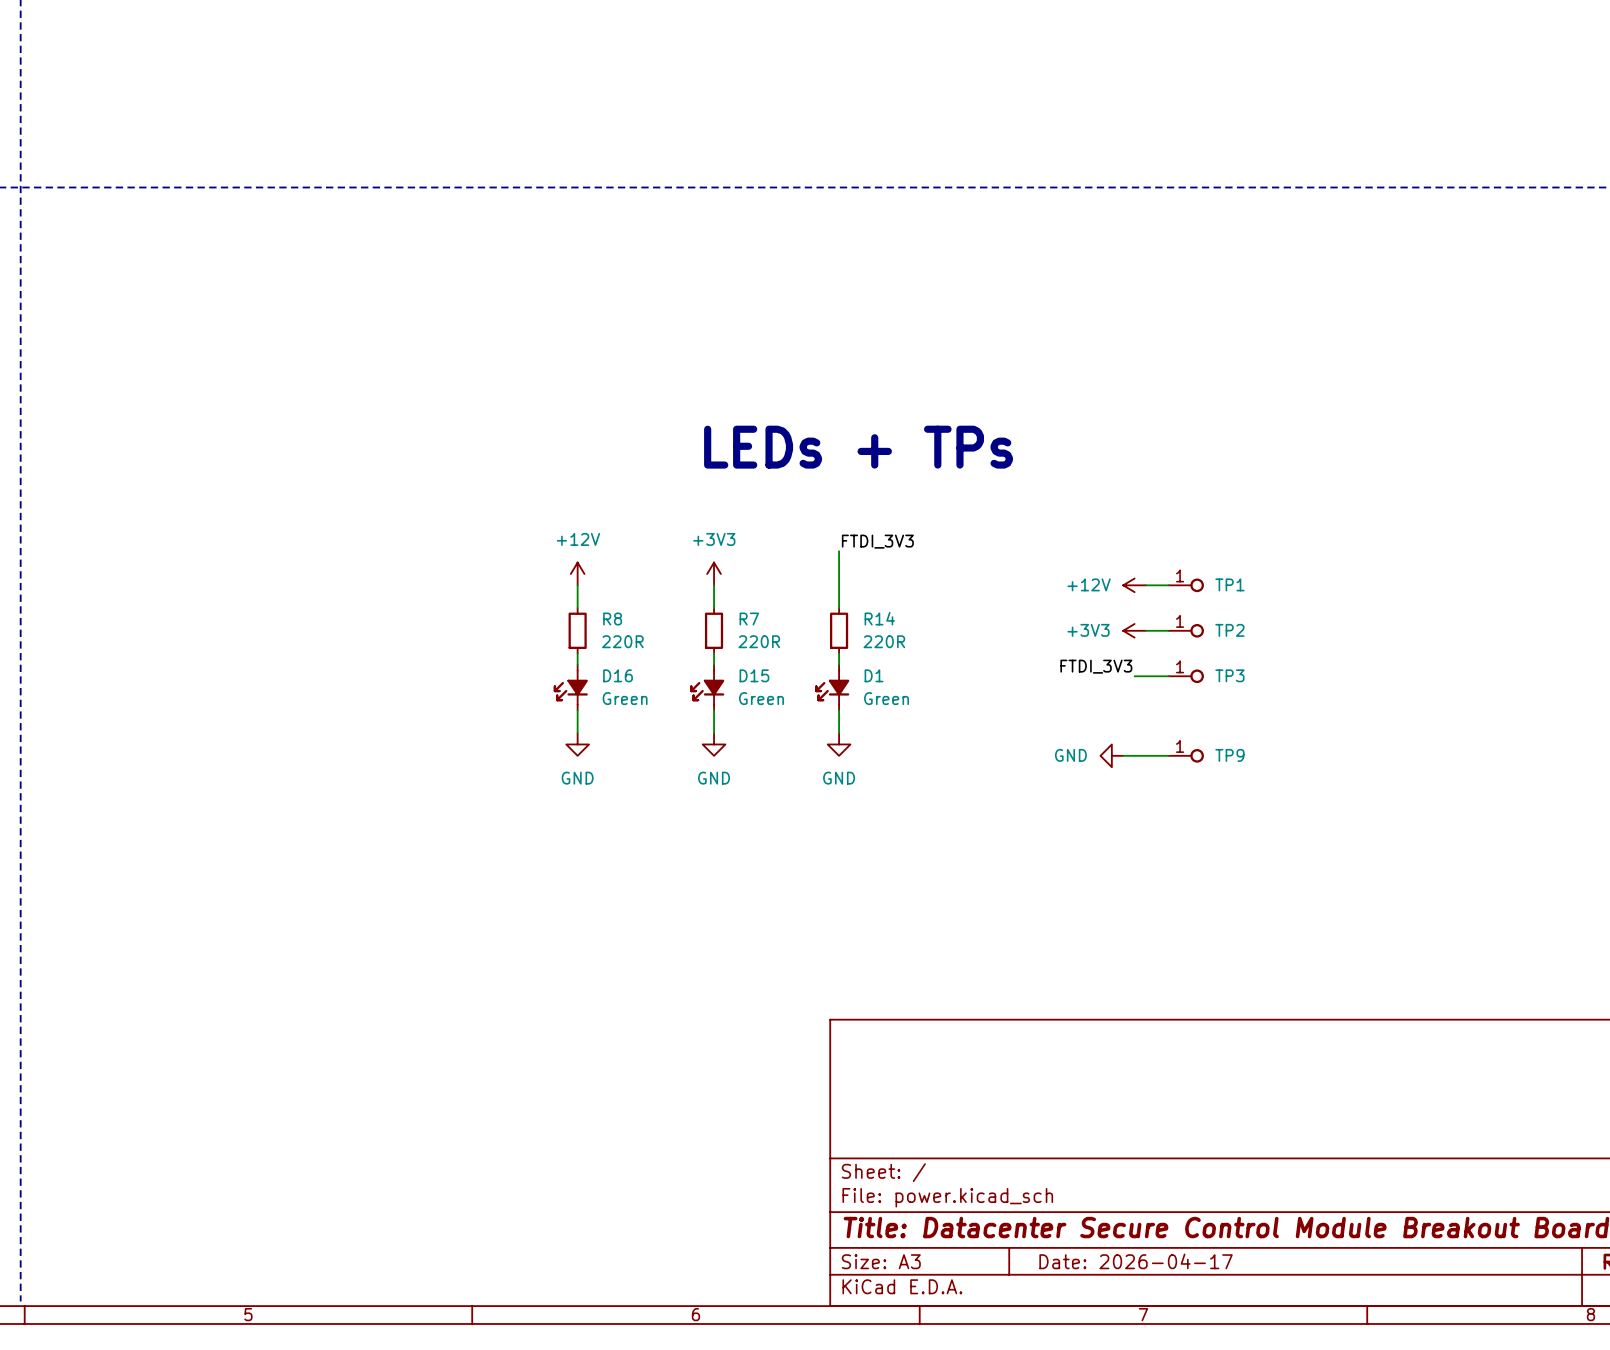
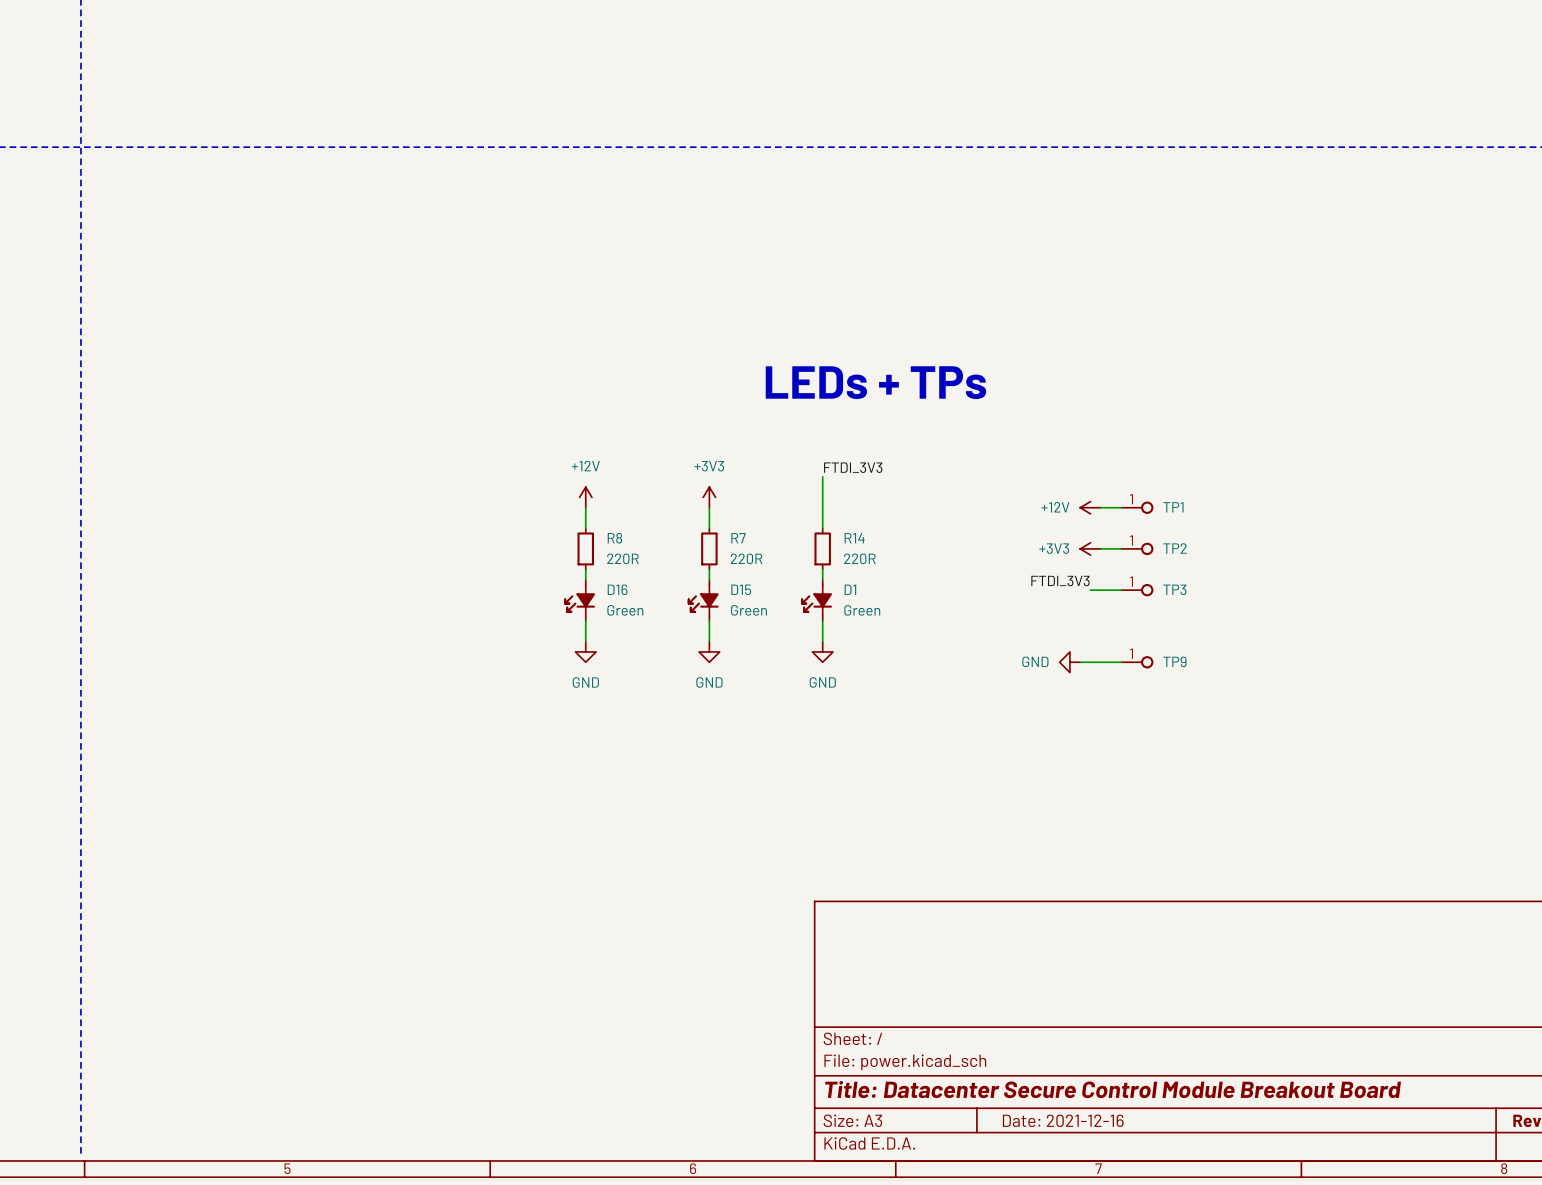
title block: Date: 2026-04-17 (1136, 1261) -> Date: 2021-12-16 (1063, 1120)

